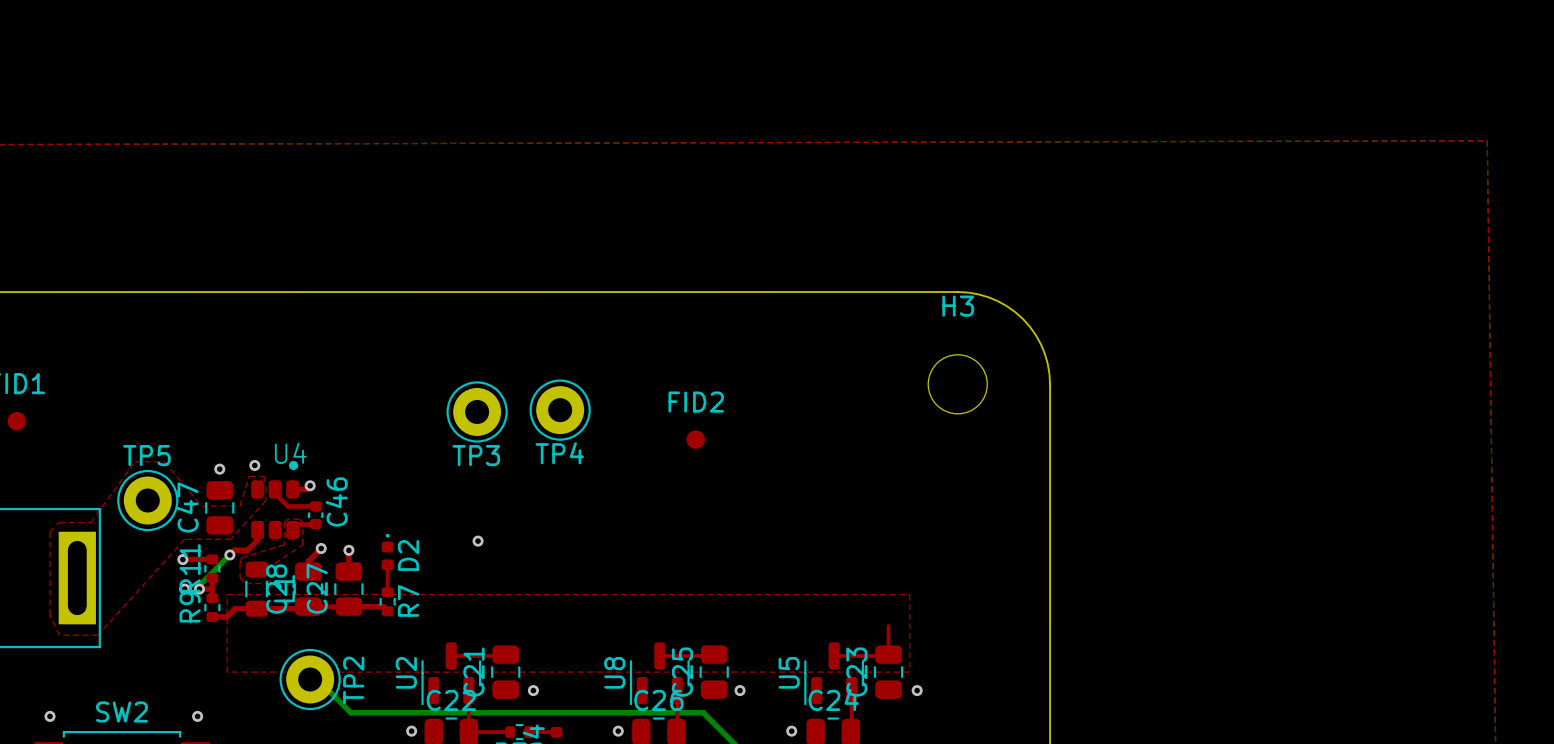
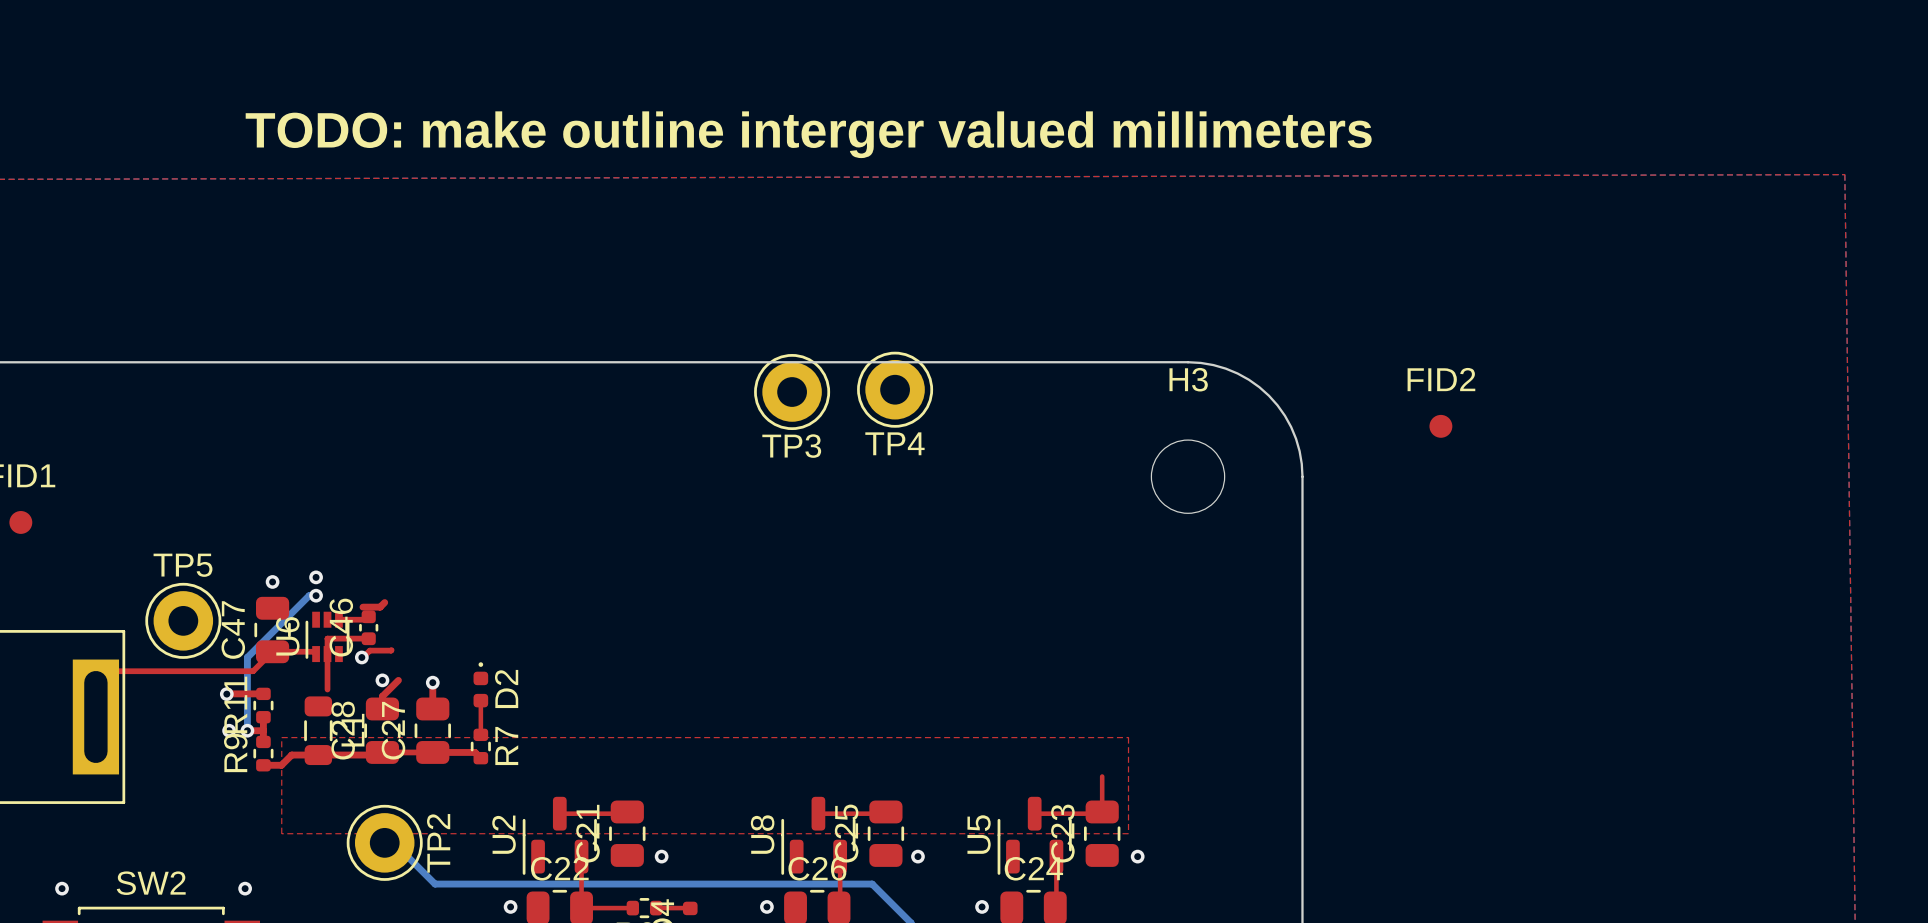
text: none -> TODO: make outline interger valued millimeters (808, 134)
TP4 position: (560, 410) -> (895, 389)
TP3 position: (477, 411) -> (792, 392)
FID2 position: (695, 439) -> (1440, 426)
top zone outline: (134, 461) (90, 522) (59, 522) (50, 531) (50, 614) (59, 635) (97, 635) (184, 539) (230, 539) (265, 500) (264, 476) (249, 476) (240, 506) (201, 506) (164, 461) (134, 461) -> none
via: none -> (316, 595)
via: (310, 485) -> none
top track: (275, 489) (275, 493) (287, 506) (315, 506) -> none
top track: none -> (338, 619) (365, 619)
U4: (275, 500) -> none
C46 name position: C46 (336, 502) -> C46 (341, 627)
U6: none -> (327, 636)
top track: none -> (327, 638) (327, 689)
top track: none -> (327, 638) (368, 638)
C46 position: (315, 515) -> (368, 627)
top zone outline: (288, 518) (299, 518) (302, 522) (302, 544) (275, 563) (275, 576) (265, 583) (245, 583) (240, 578) (241, 557) (284, 544) (284, 522) (288, 518) -> none
top track: none -> (316, 654) (313, 651) (272, 651) (253, 671) (95, 671)
top track: (257, 530) (257, 540) (247, 550) (234, 550) (229, 554) -> none
via: none -> (361, 657)
via: (478, 541) -> none
via position: (321, 548) -> (382, 680)
bottom track: (229, 554) (199, 585) -> (316, 595) (309, 595) (247, 657) (247, 726)
via: (229, 554) -> none

